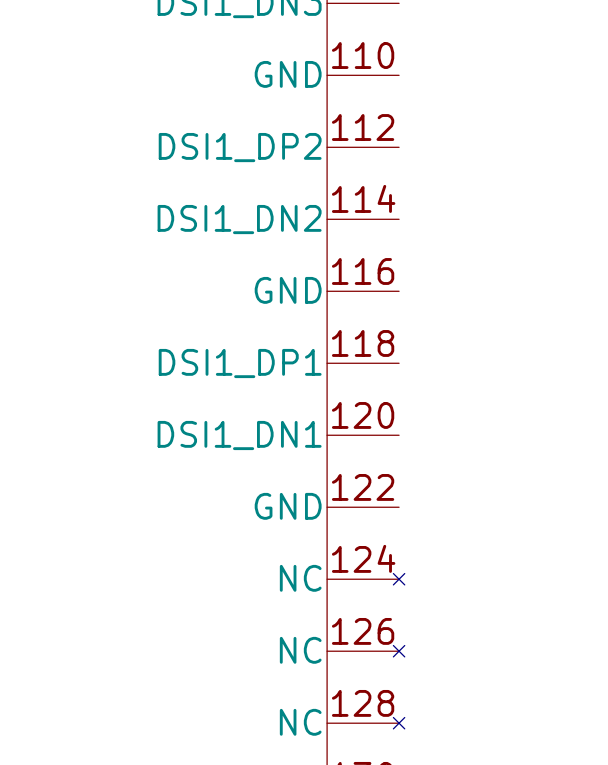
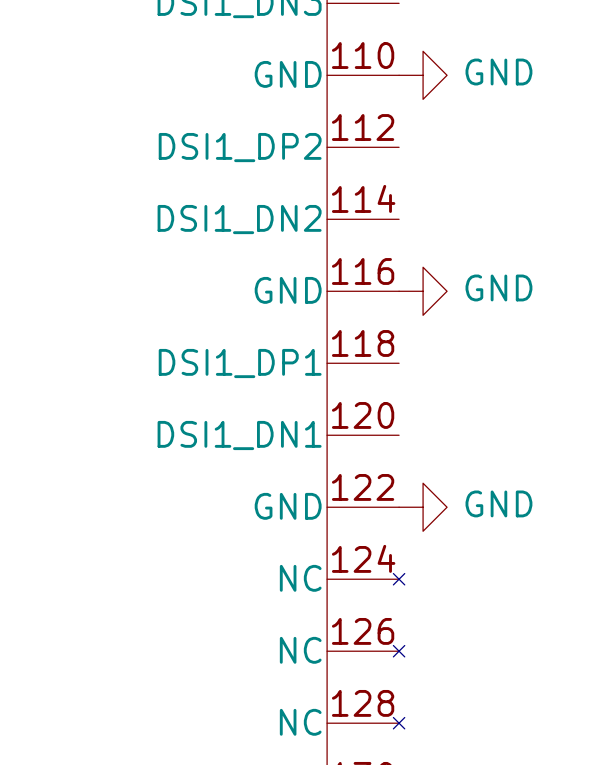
power symbol: none -> GND (423, 75)
power symbol: none -> GND (423, 291)
power symbol: none -> GND (423, 507)

